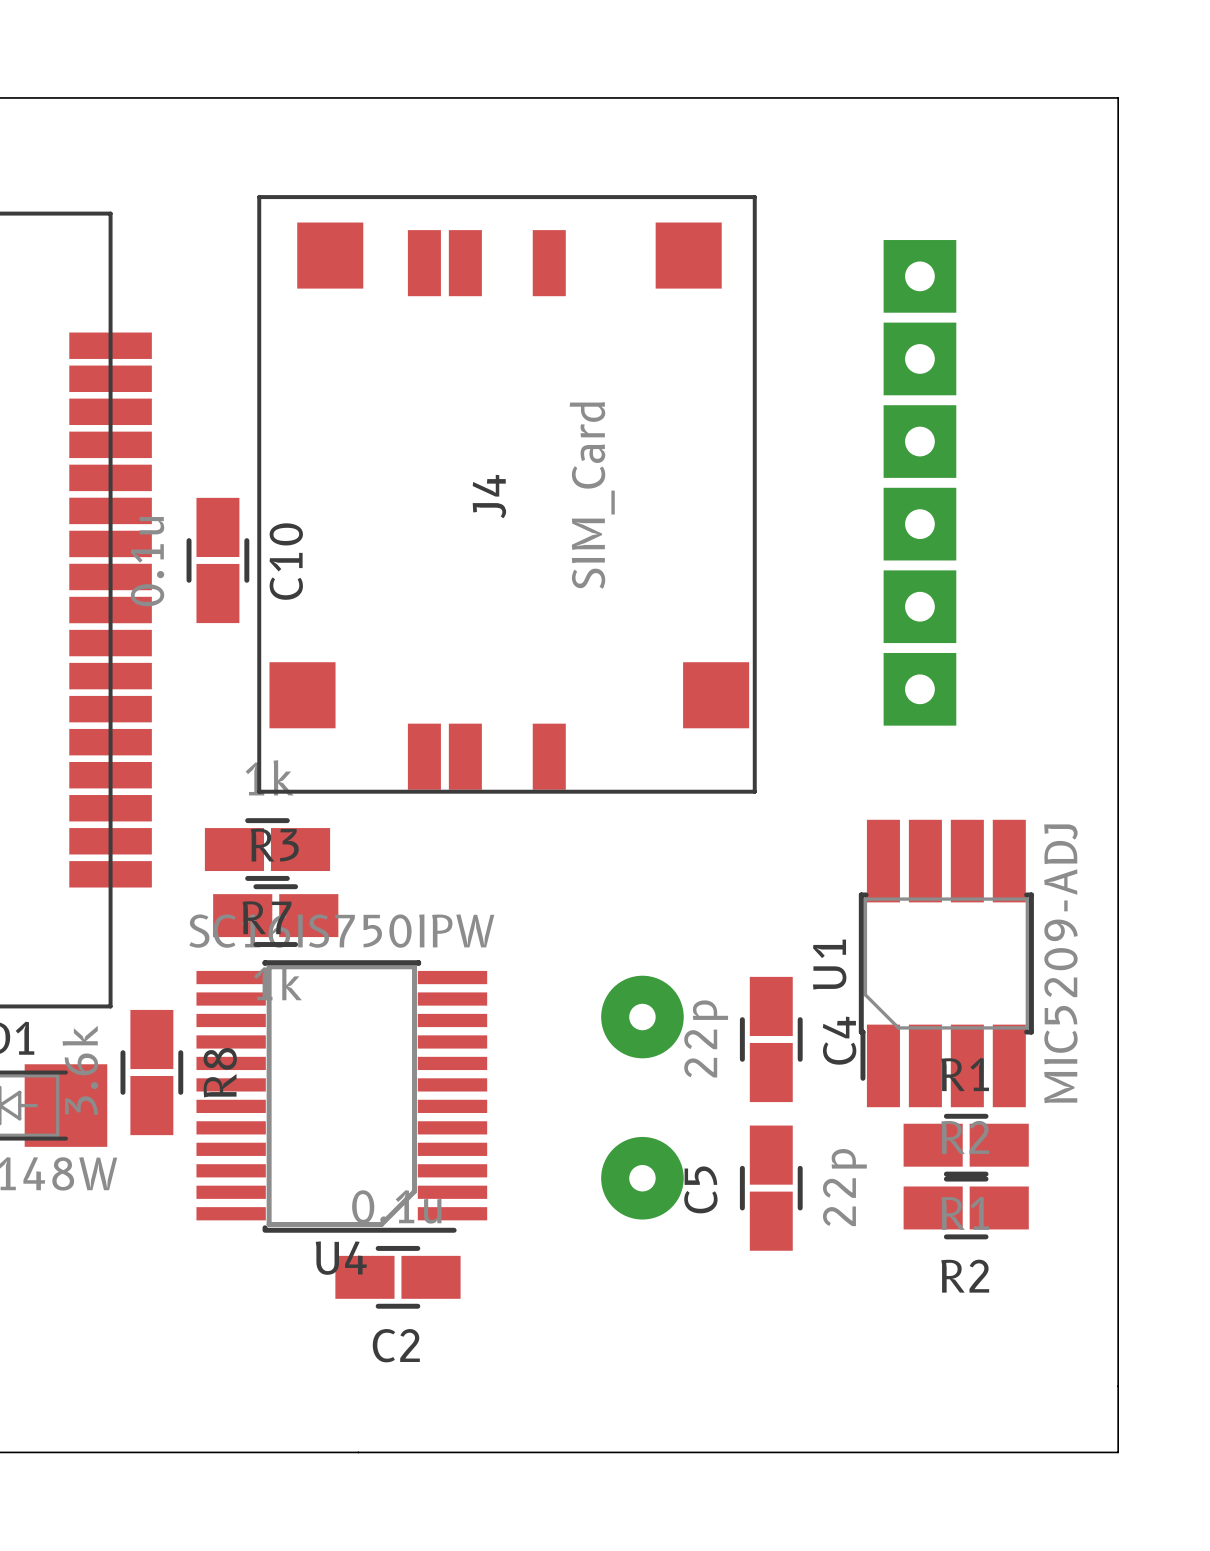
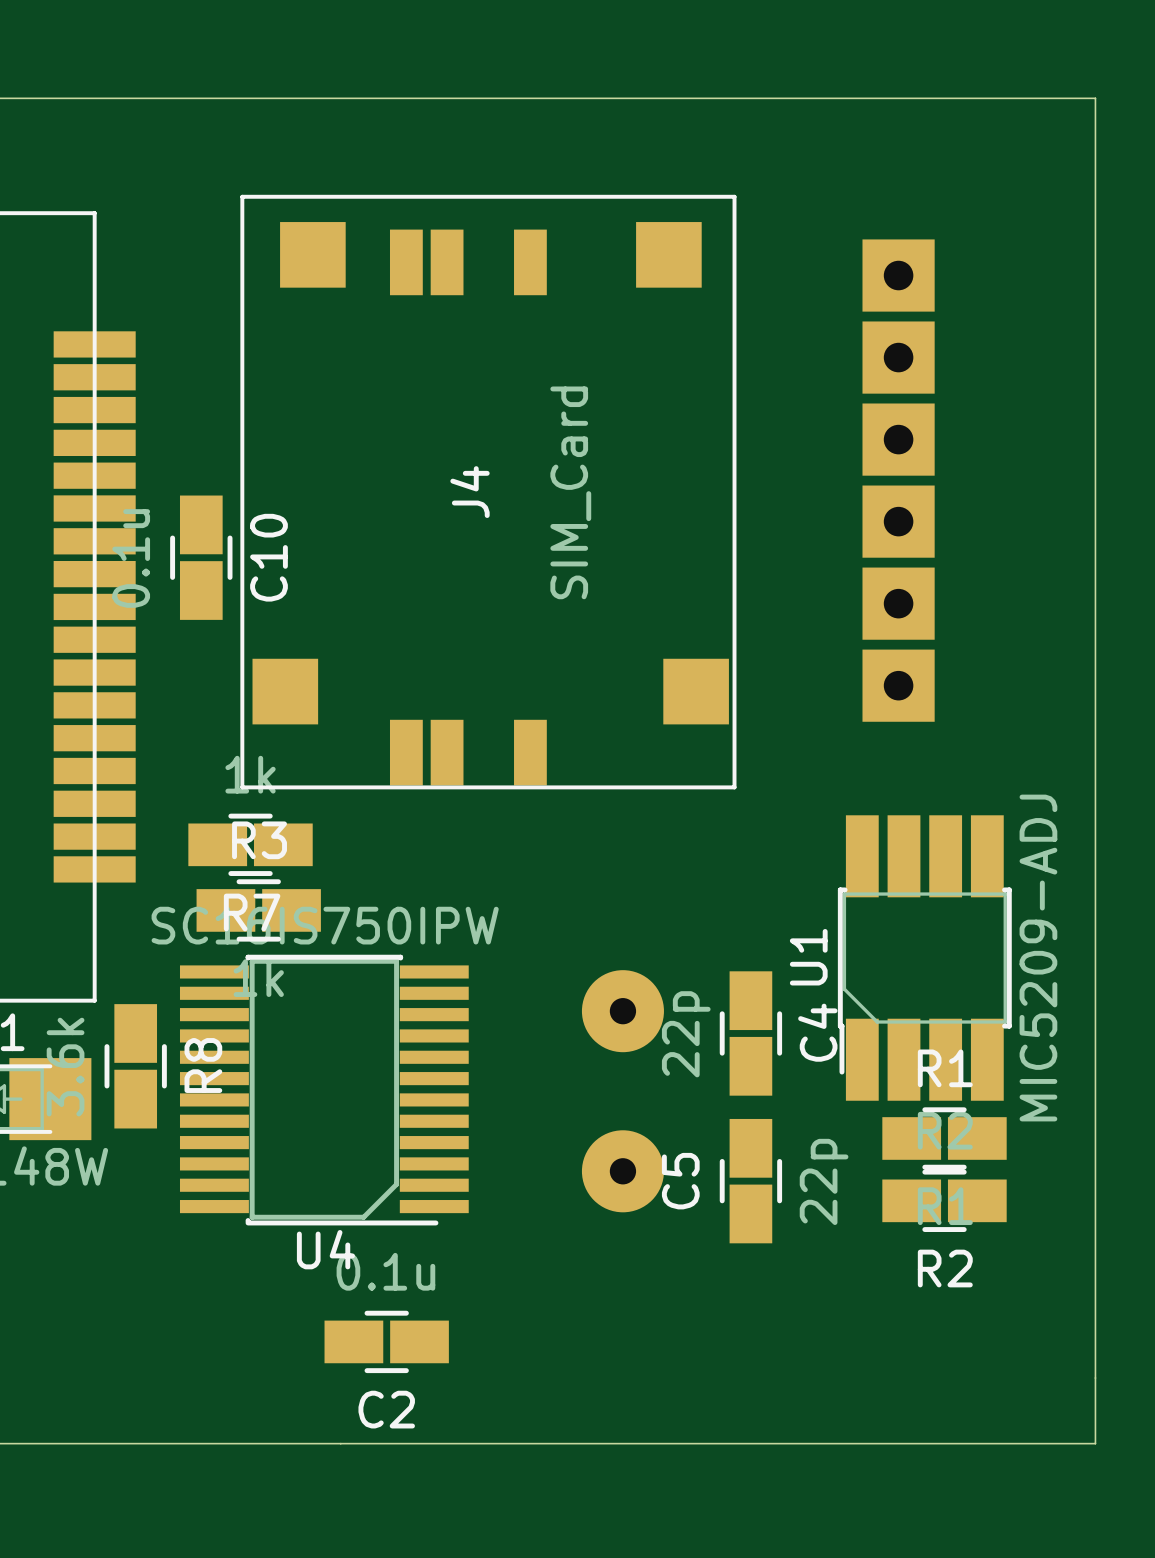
C2 position: (397, 1277) -> (386, 1341)

